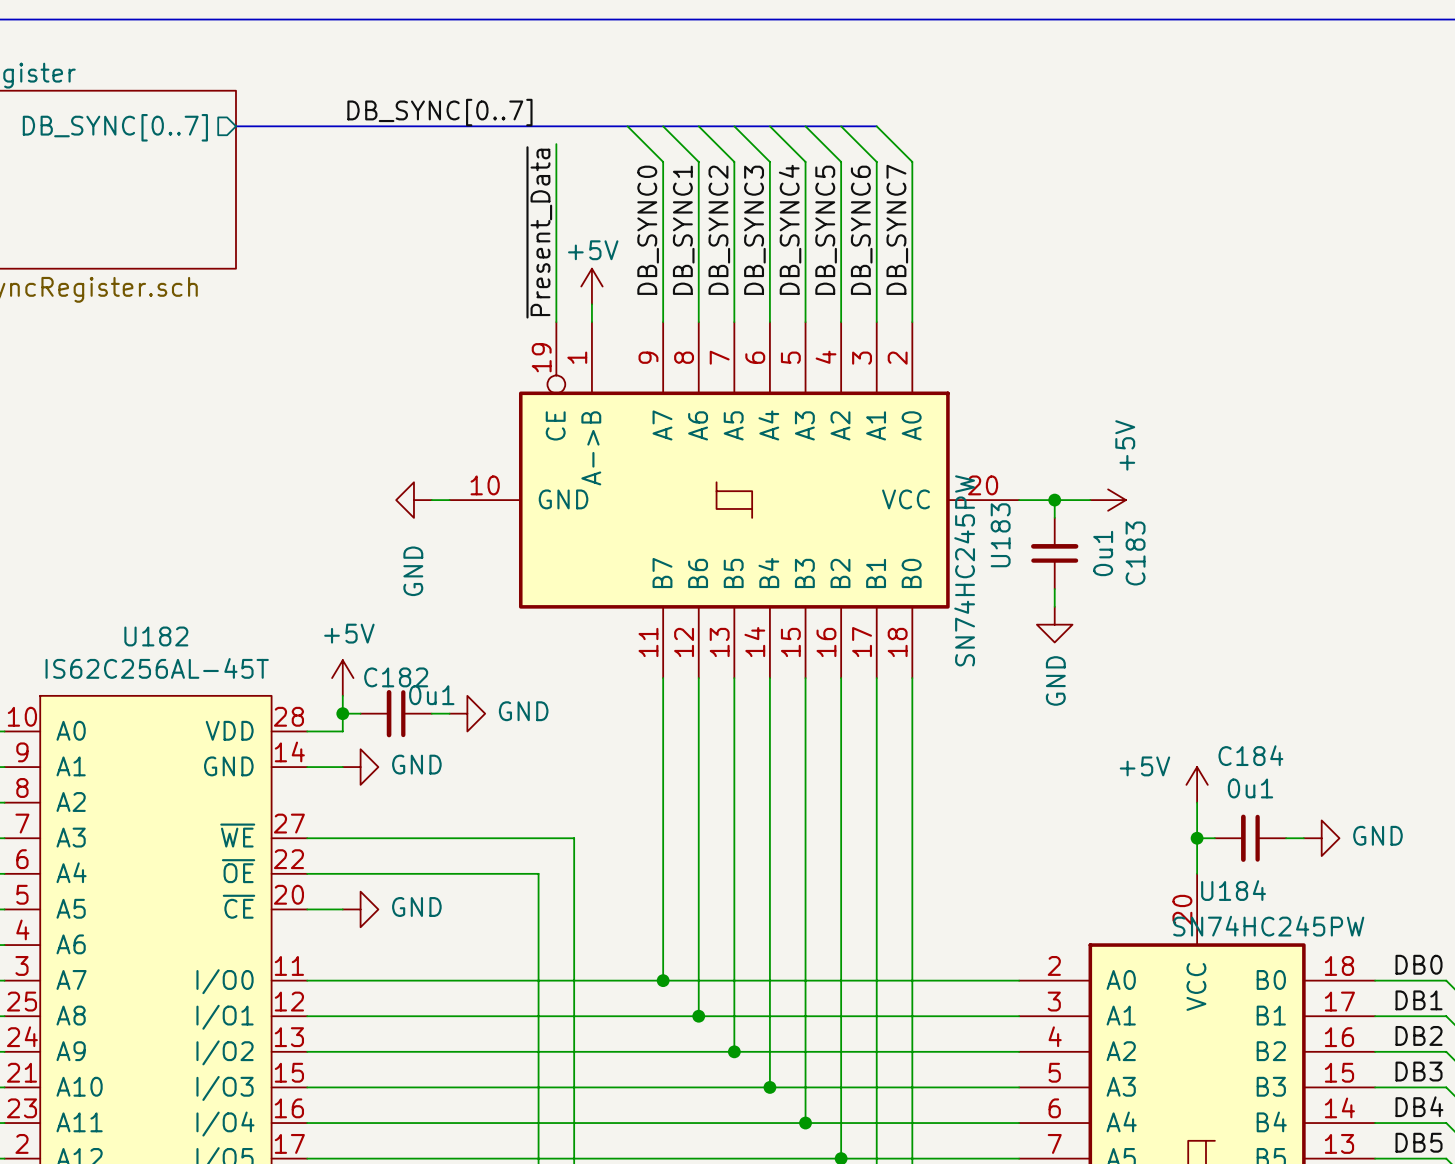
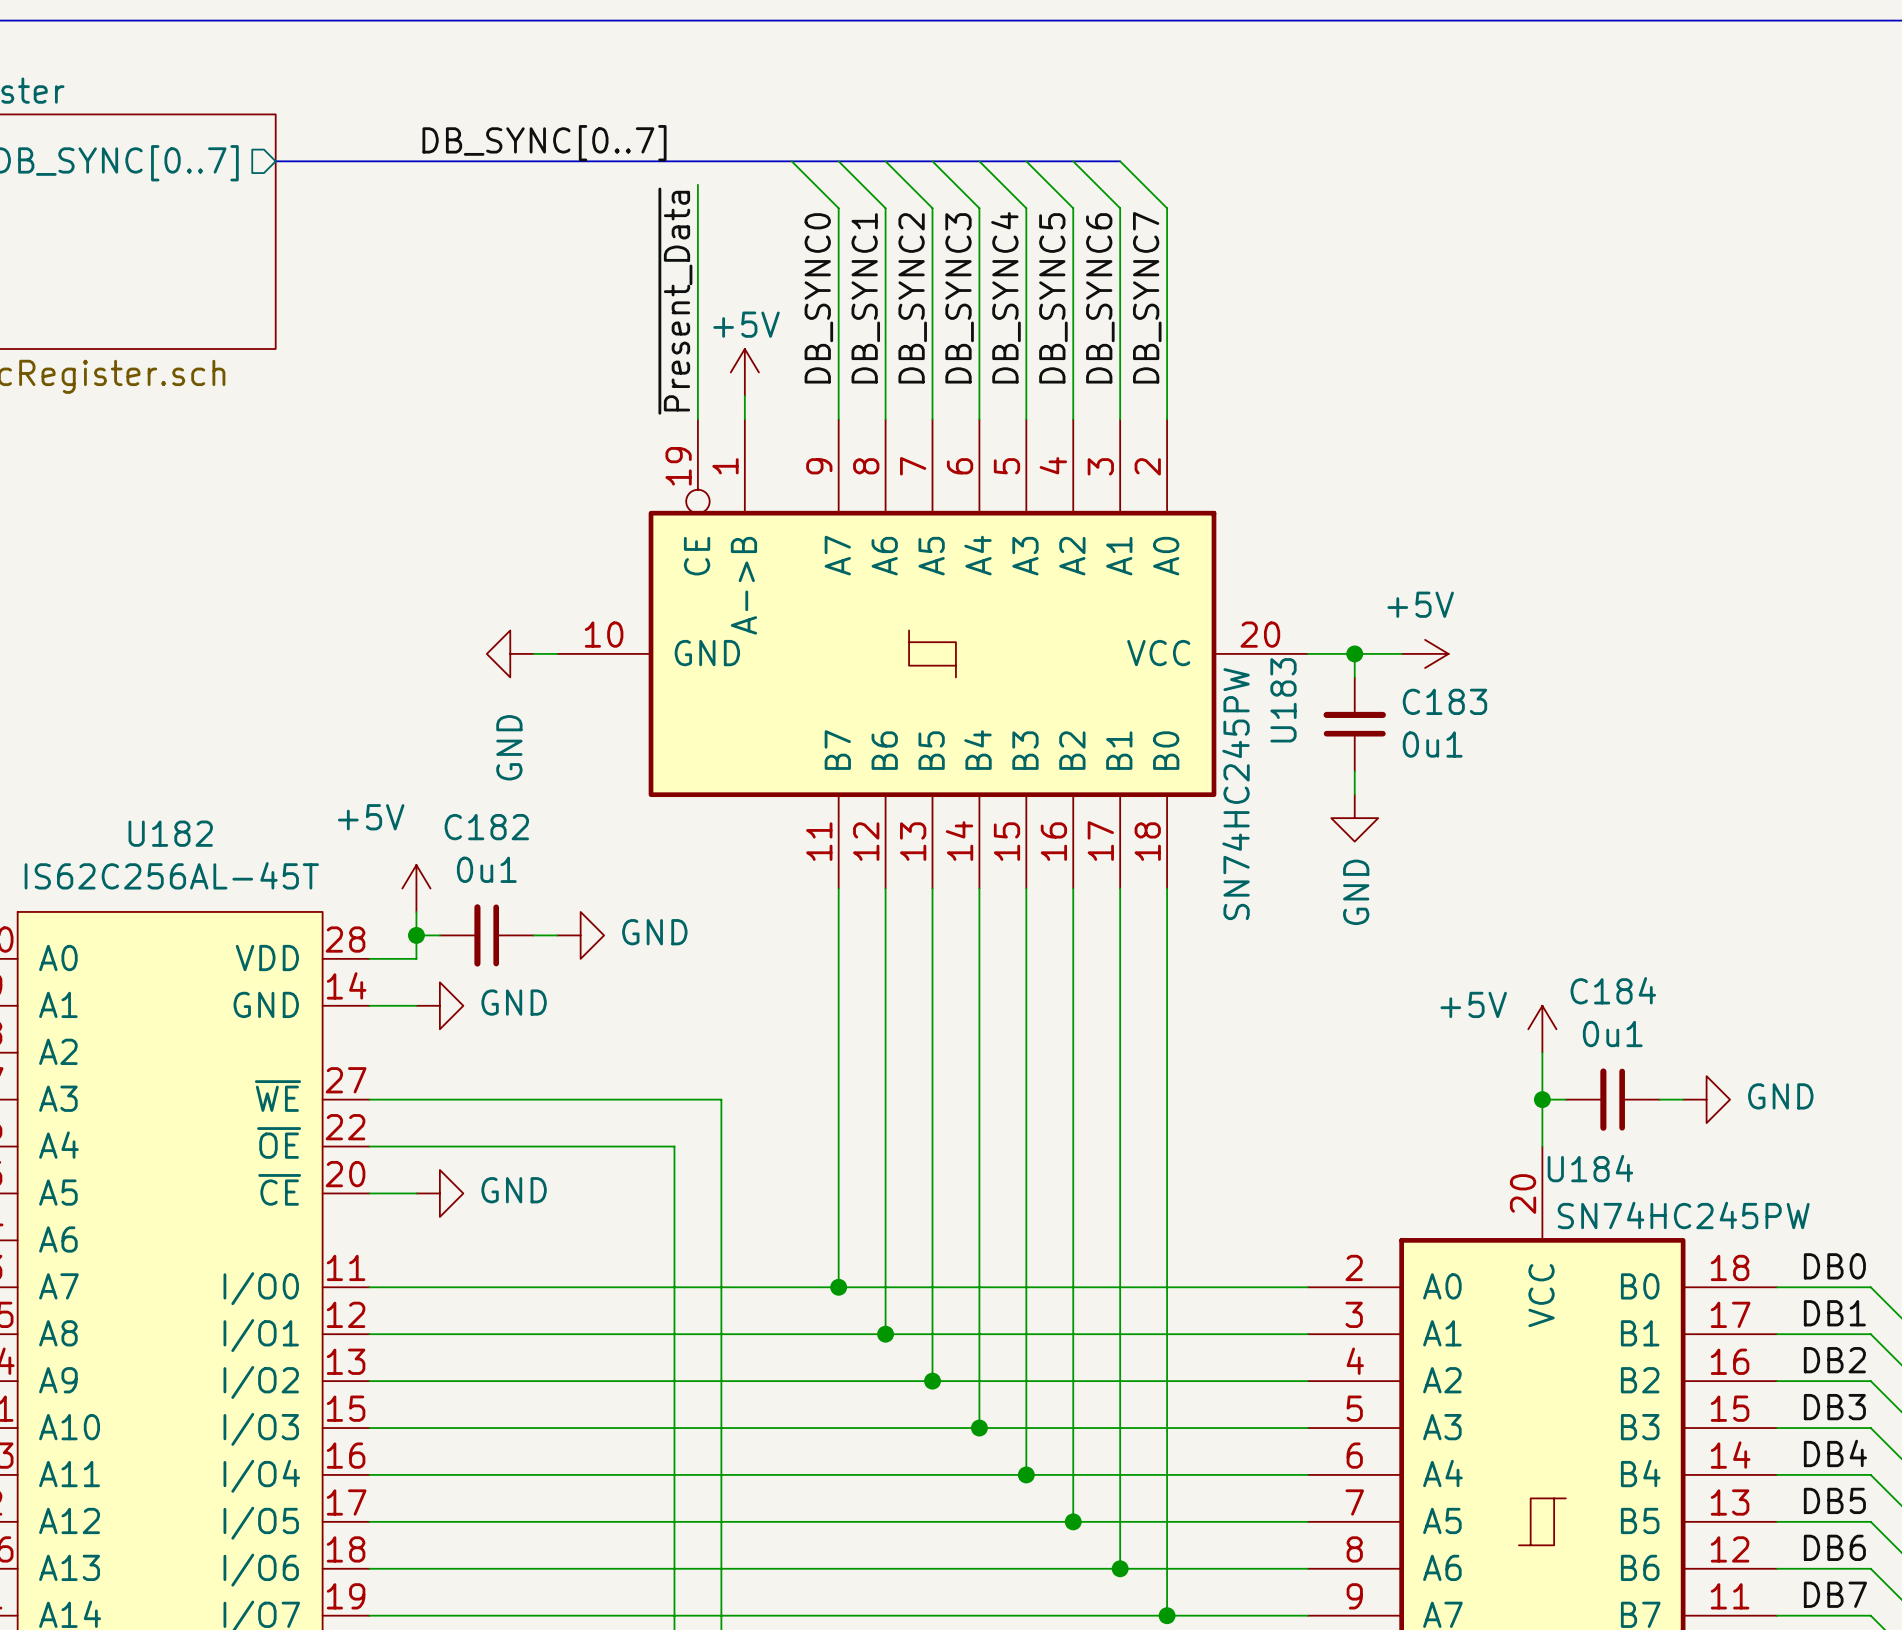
power symbol text rotation: 0° (1125, 445) -> 90° clockwise (1420, 604)
C183 value rotation: 0° (1103, 553) -> 90° clockwise (1432, 744)
C183 name rotation: 0° (1135, 553) -> 90° clockwise (1444, 701)
U183 value position: SN74HC245PW (964, 570) -> SN74HC245PW (1236, 794)
power symbol text position: +5V (349, 633) -> +5V (371, 817)
C182 name position: C182 (396, 677) -> C182 (486, 827)
C182 value position: 0u1 (431, 695) -> 0u1 (486, 869)
U184 value position: SN74HC245PW (1268, 926) -> SN74HC245PW (1683, 1215)

